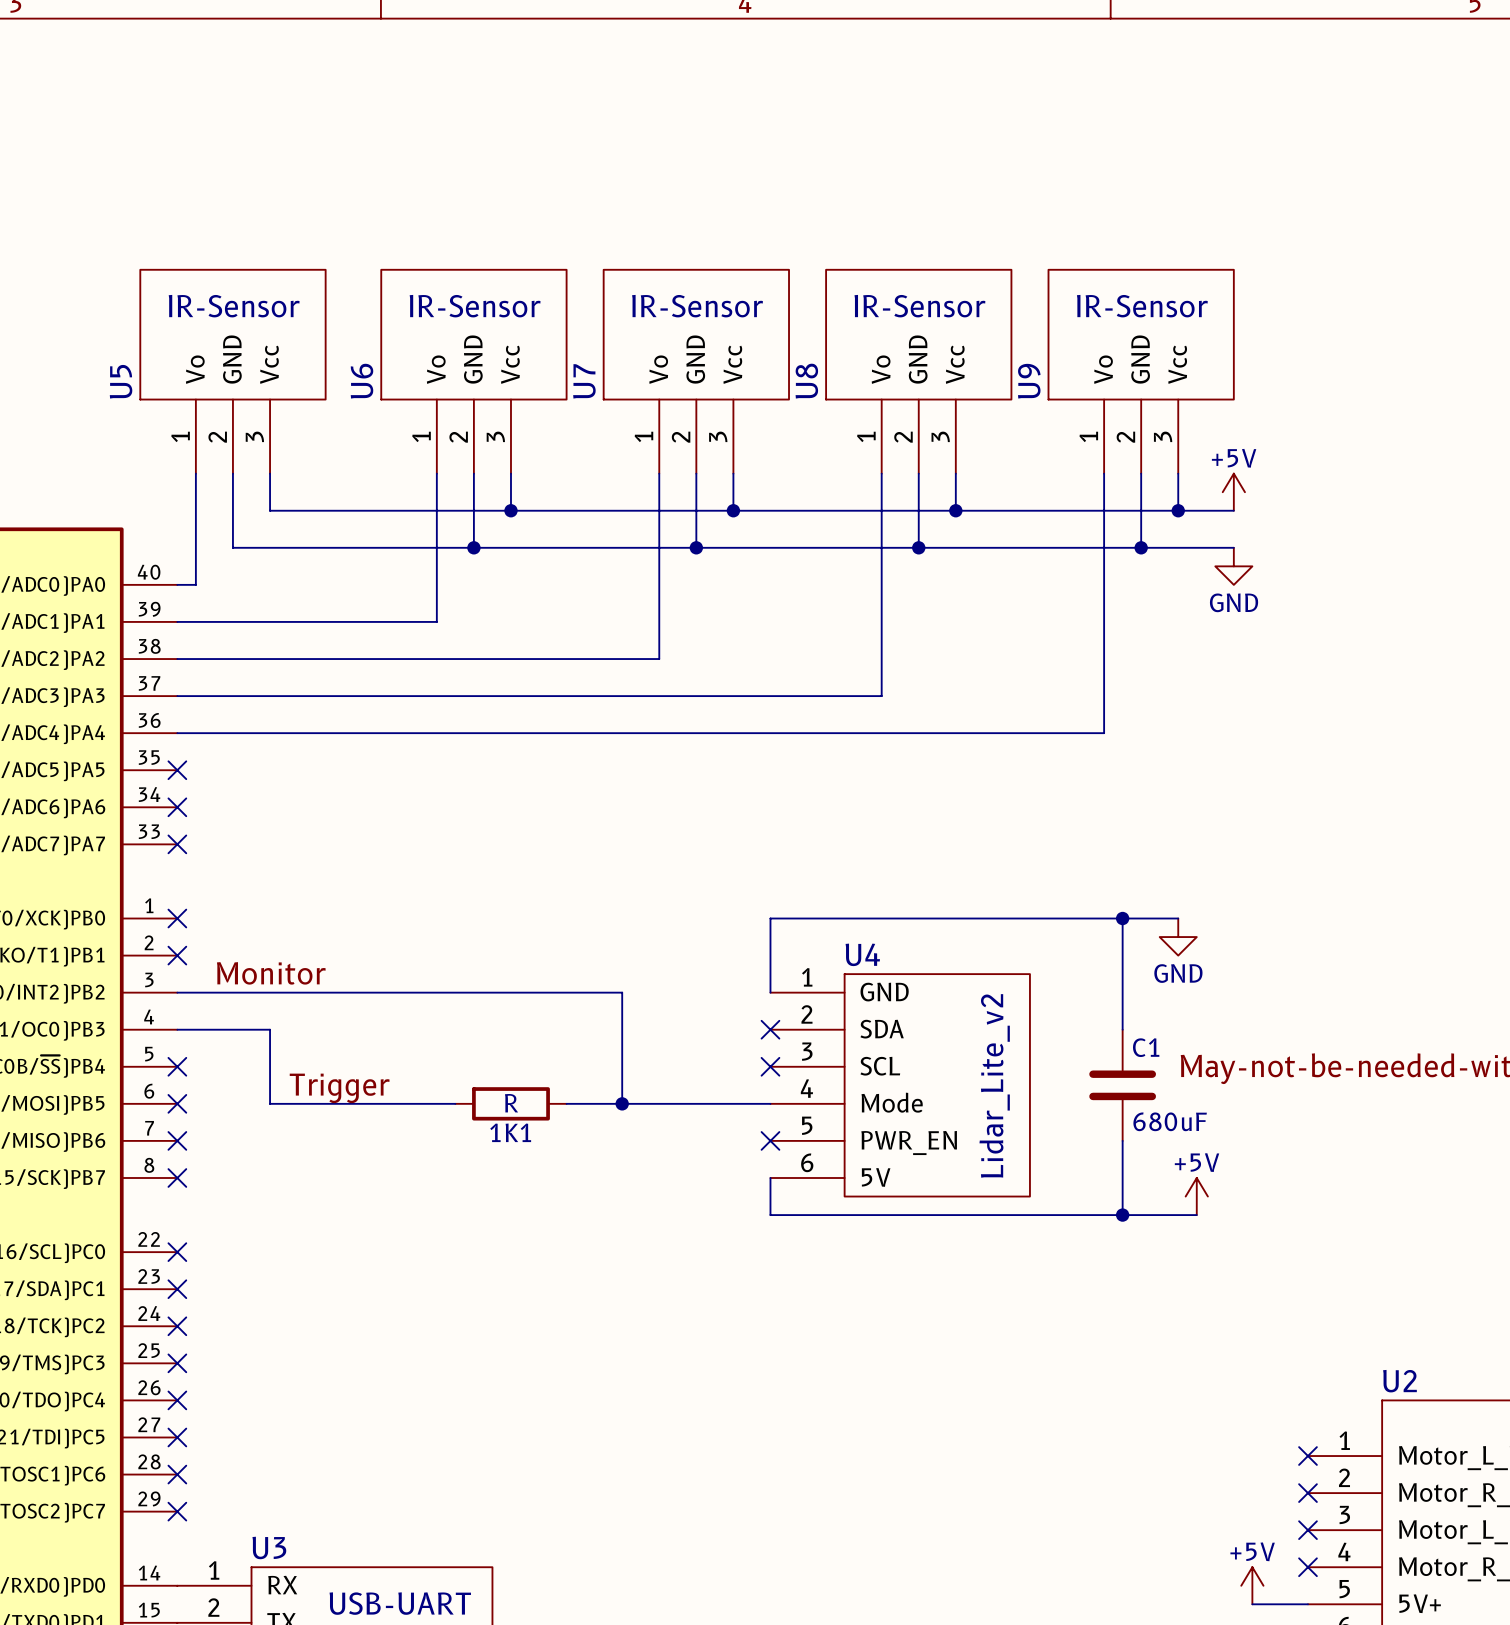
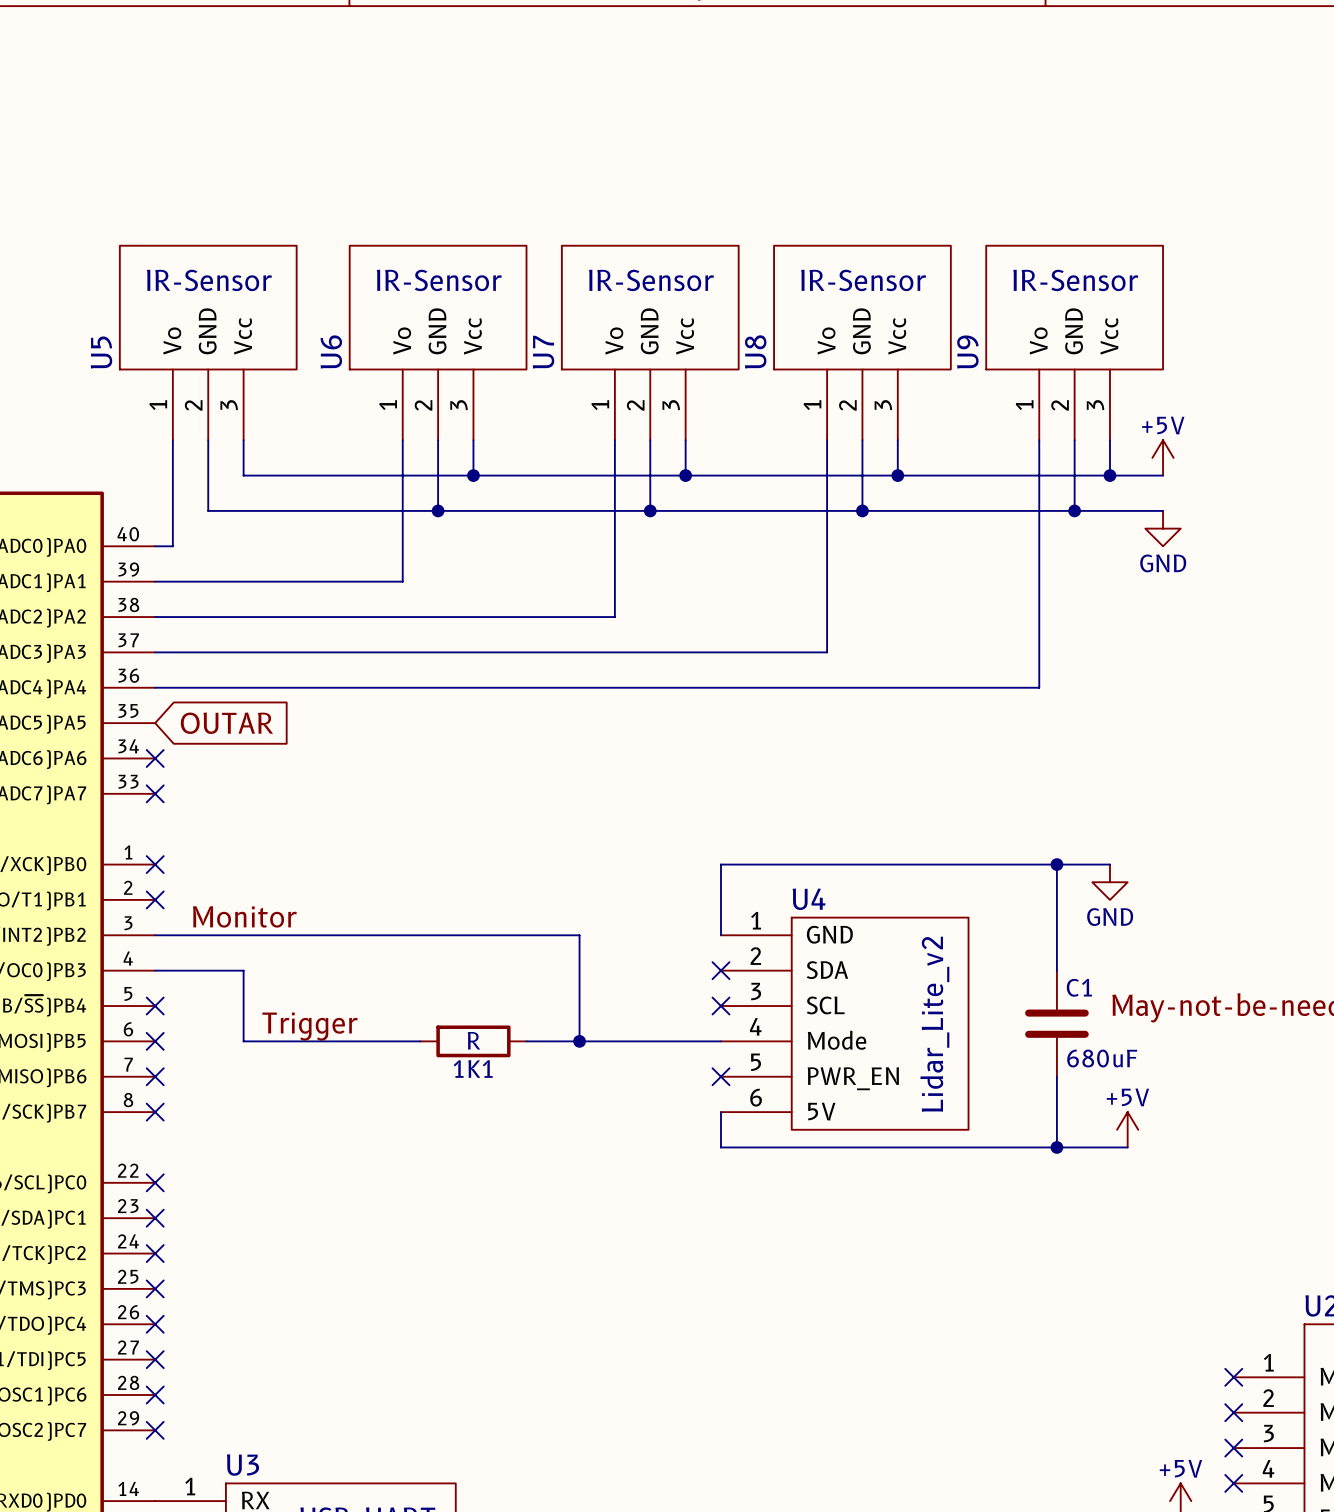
no-connect mark: (177, 770) -> none
global label: none -> OUTAR (226, 723)

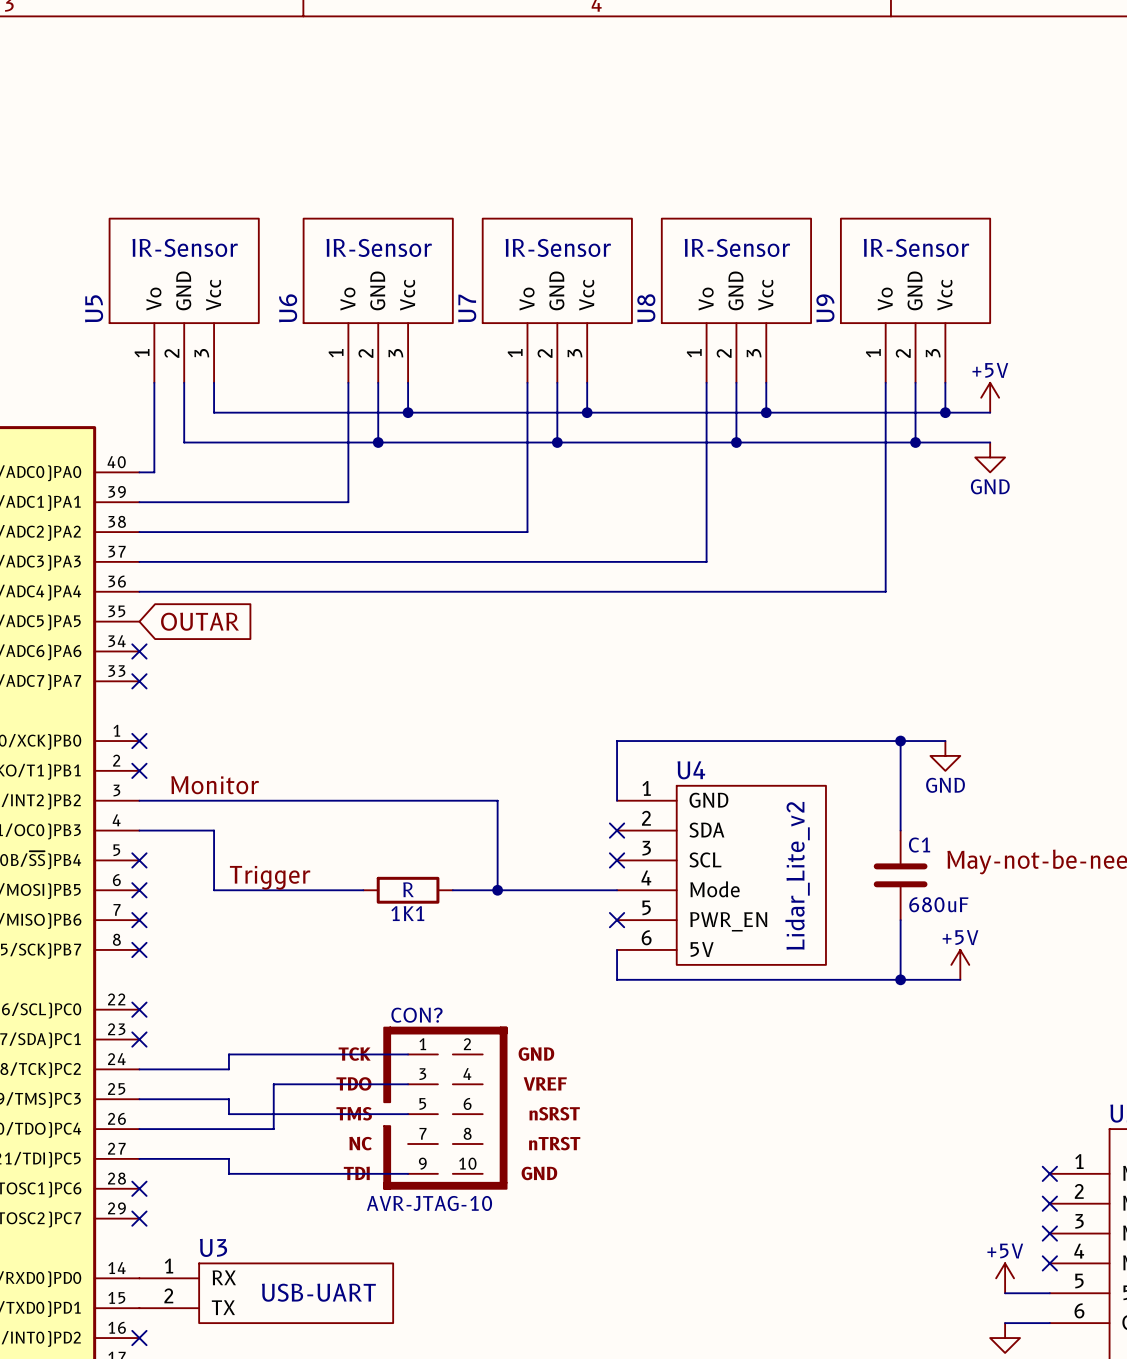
wire: none -> (408, 1054) (228, 1054) (228, 1069) (139, 1069)
no-connect mark: (155, 1253) -> none
wire: none -> (408, 1084) (273, 1084) (273, 1129) (139, 1129)
wire: none -> (139, 1099) (228, 1099) (228, 1114) (408, 1114)
no-connect mark: (155, 1288) -> none
CON?: none -> AVR-JTAG-10 (445, 1108)
no-connect mark: (155, 1324) -> none
wire: none -> (139, 1158) (228, 1158) (228, 1173) (408, 1173)
no-connect mark: (155, 1359) -> none

